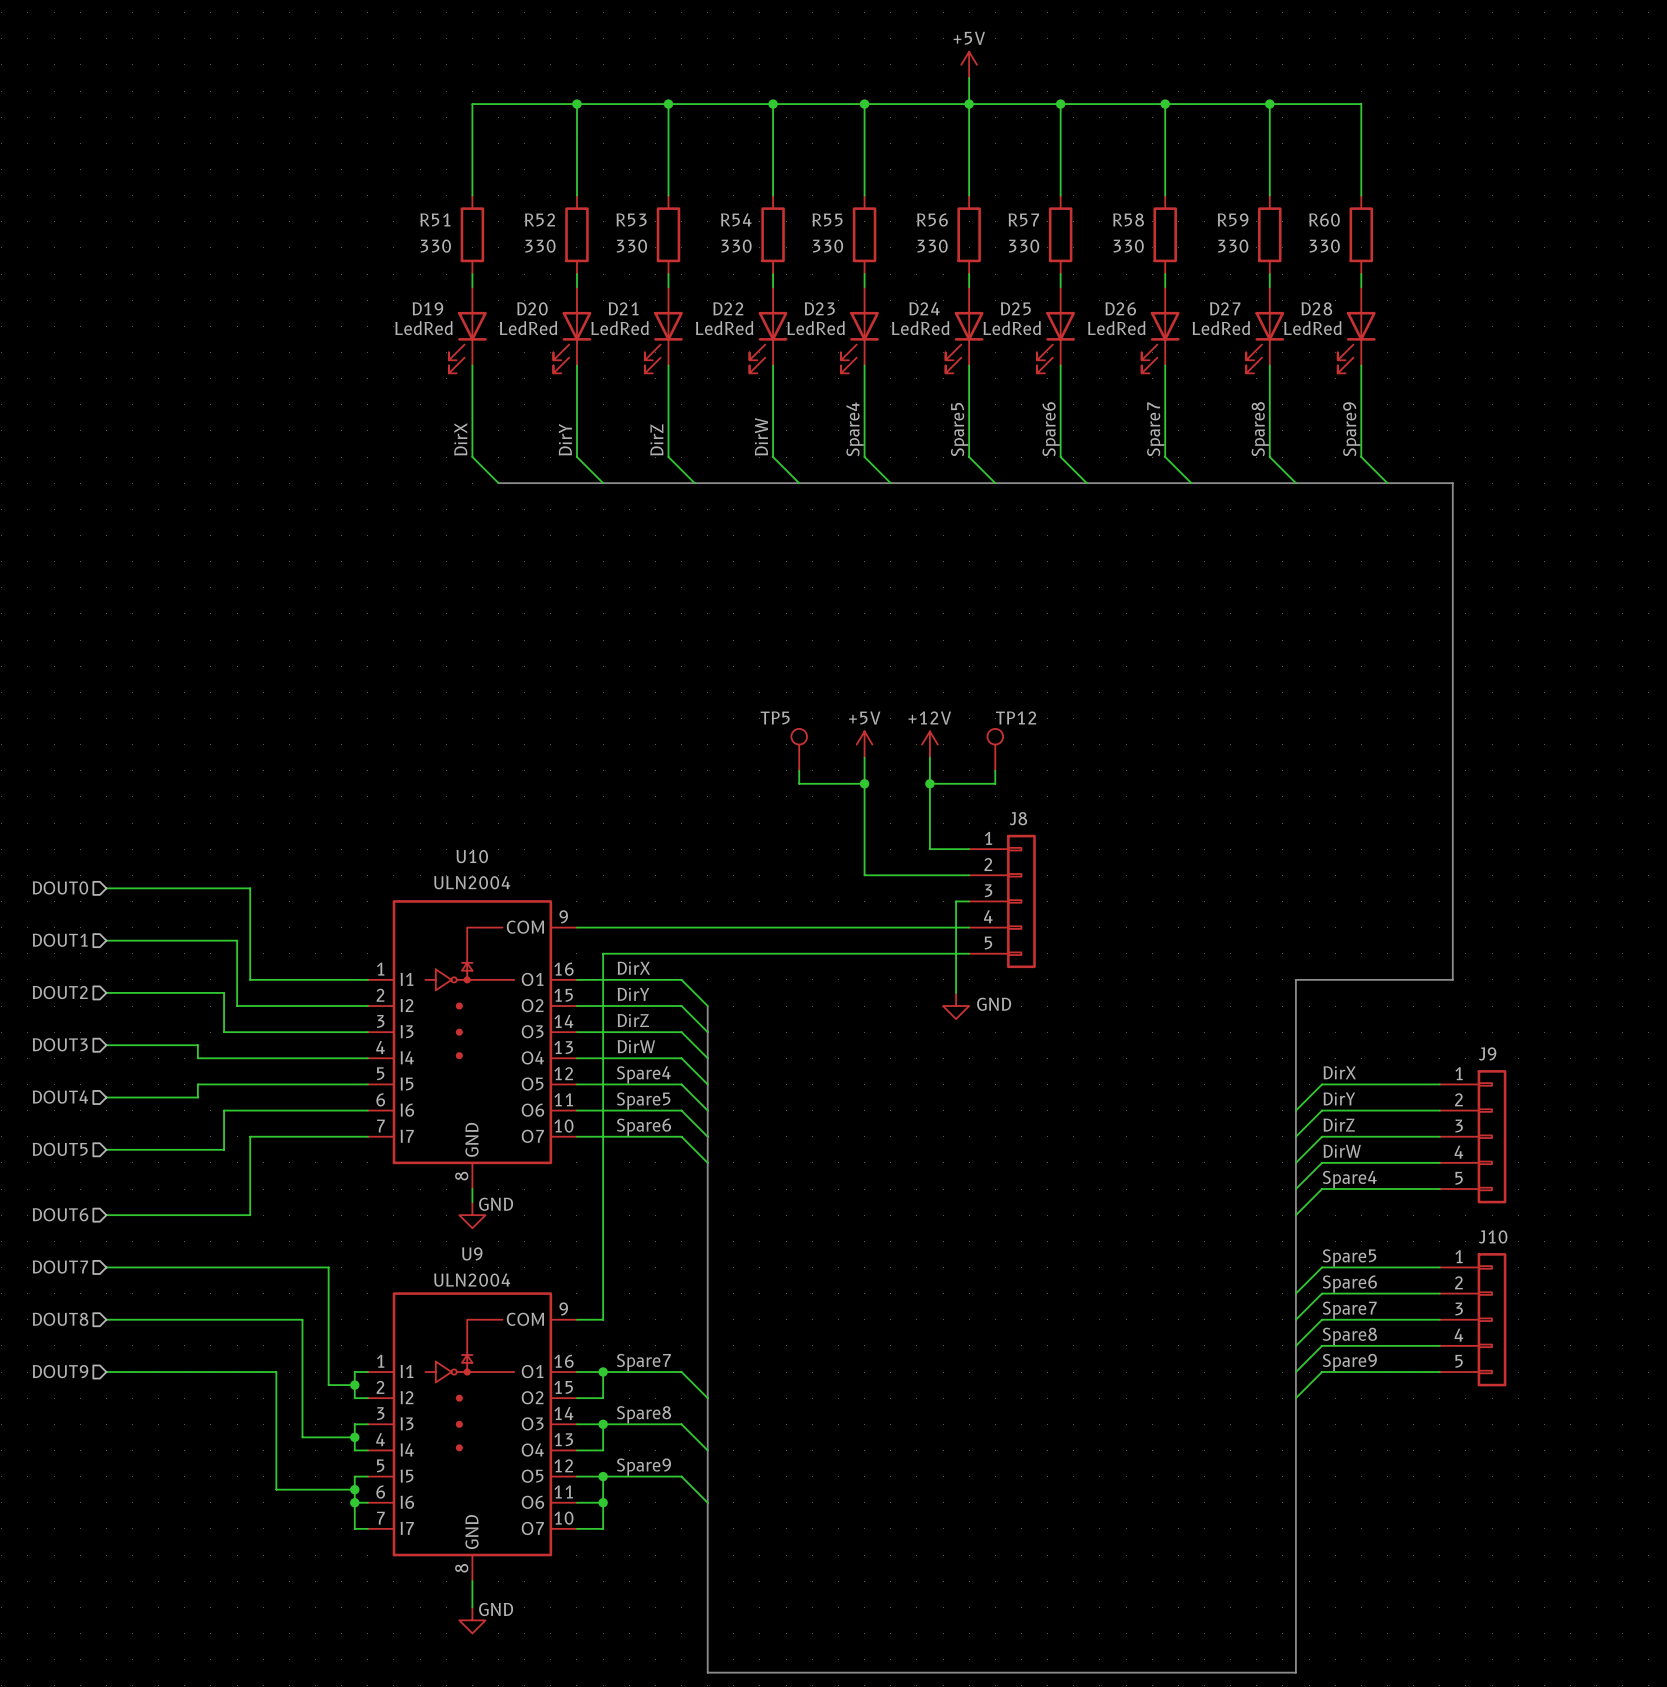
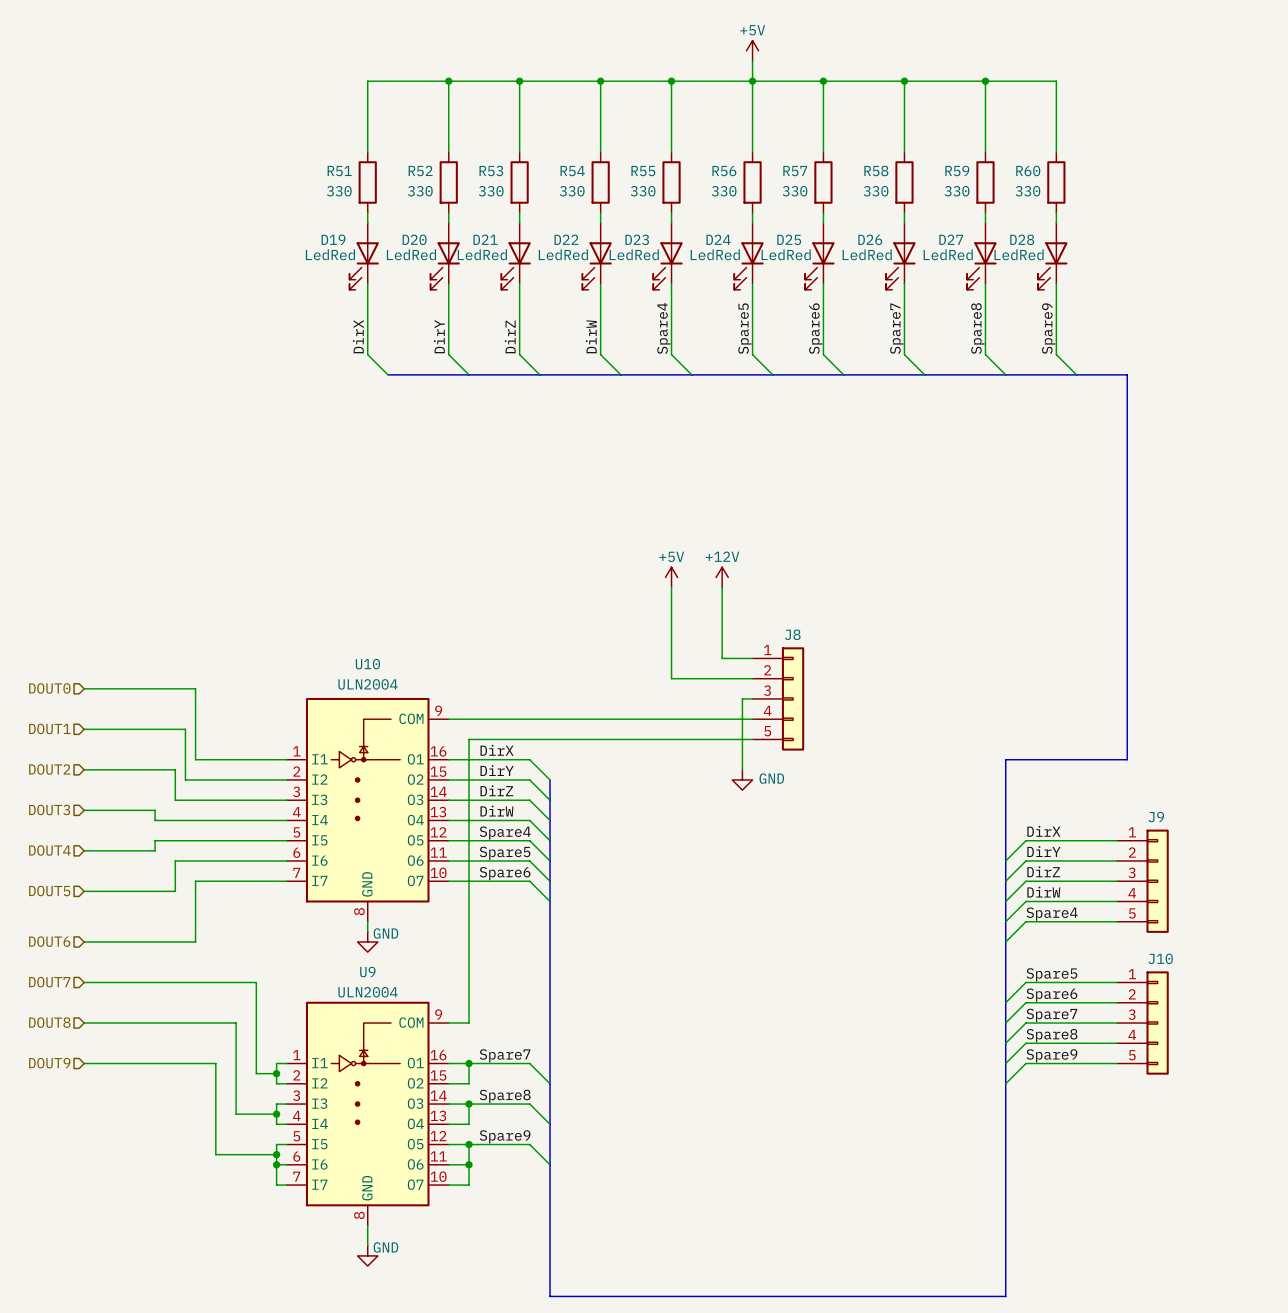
TP5: (799, 749) -> none
TP12: (995, 749) -> none
wire: (799, 770) (799, 783) (864, 783) -> none
wire: (995, 770) (995, 783) (929, 783) -> none
junction: (864, 783) -> none
junction: (929, 783) -> none

